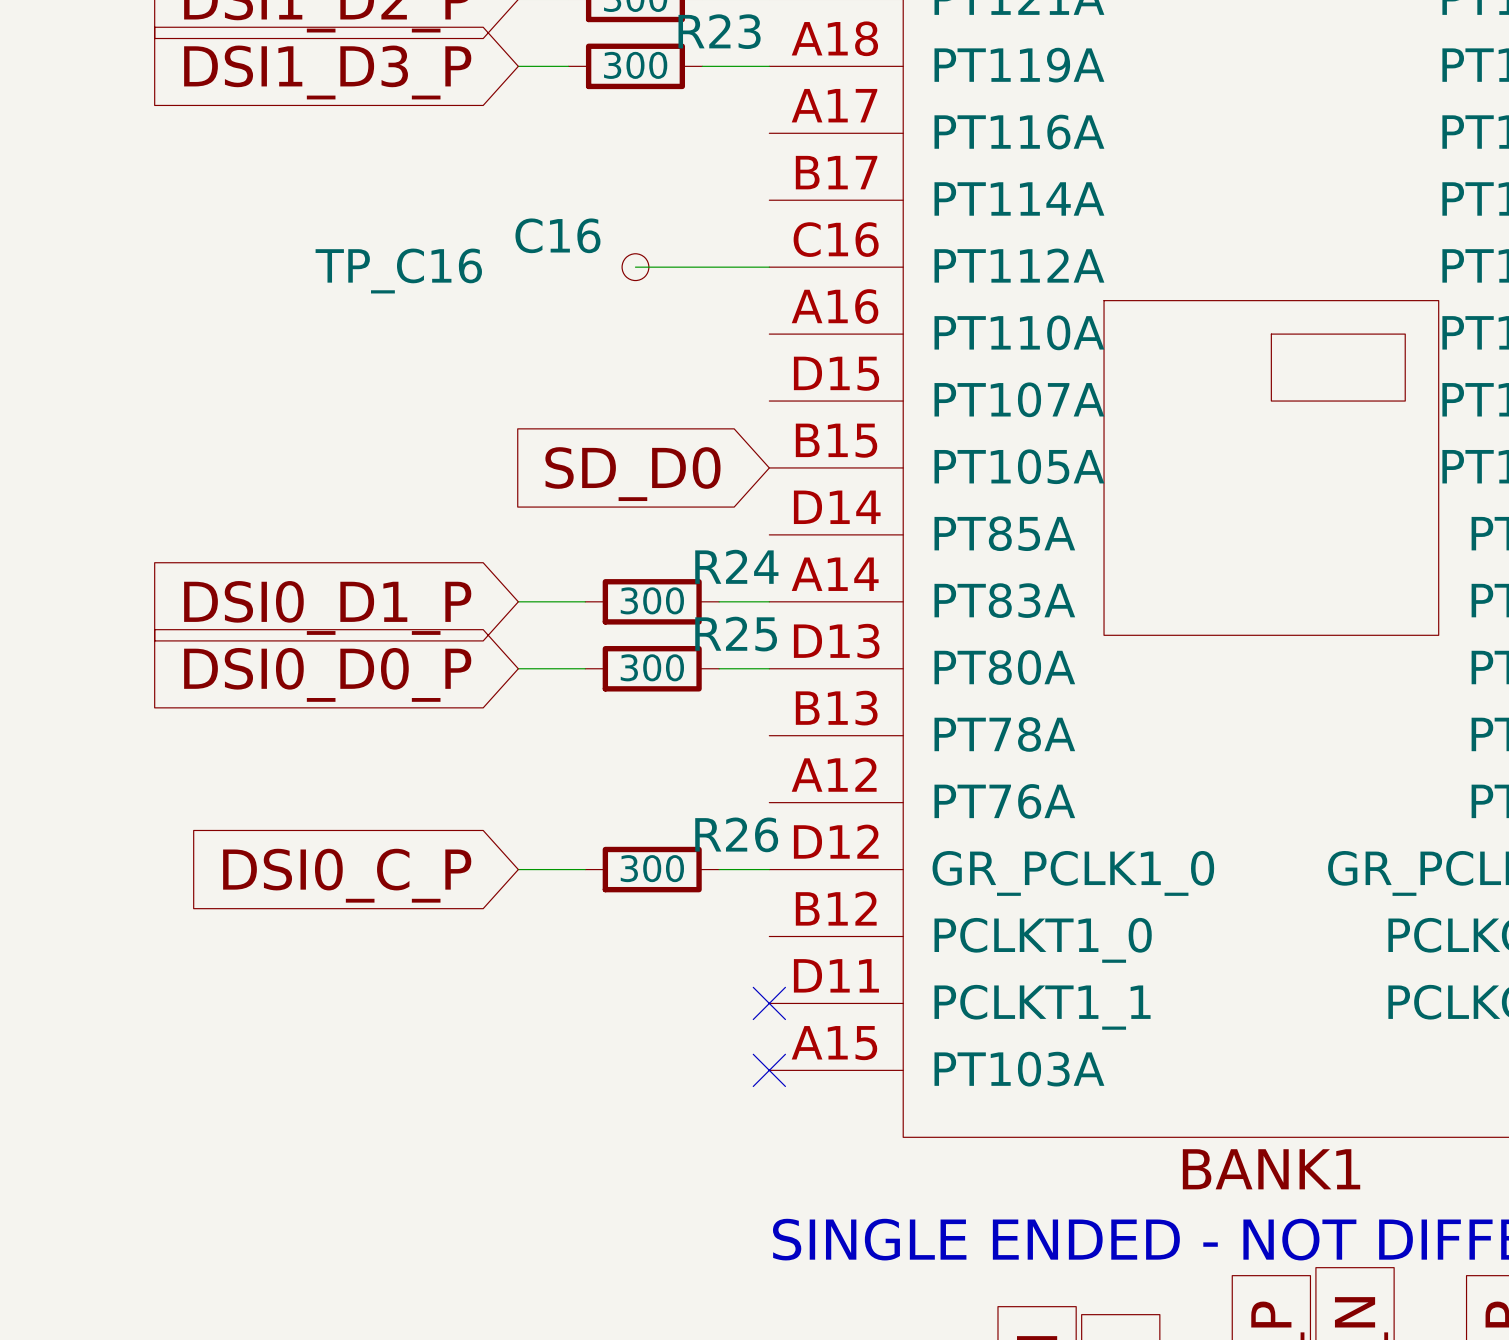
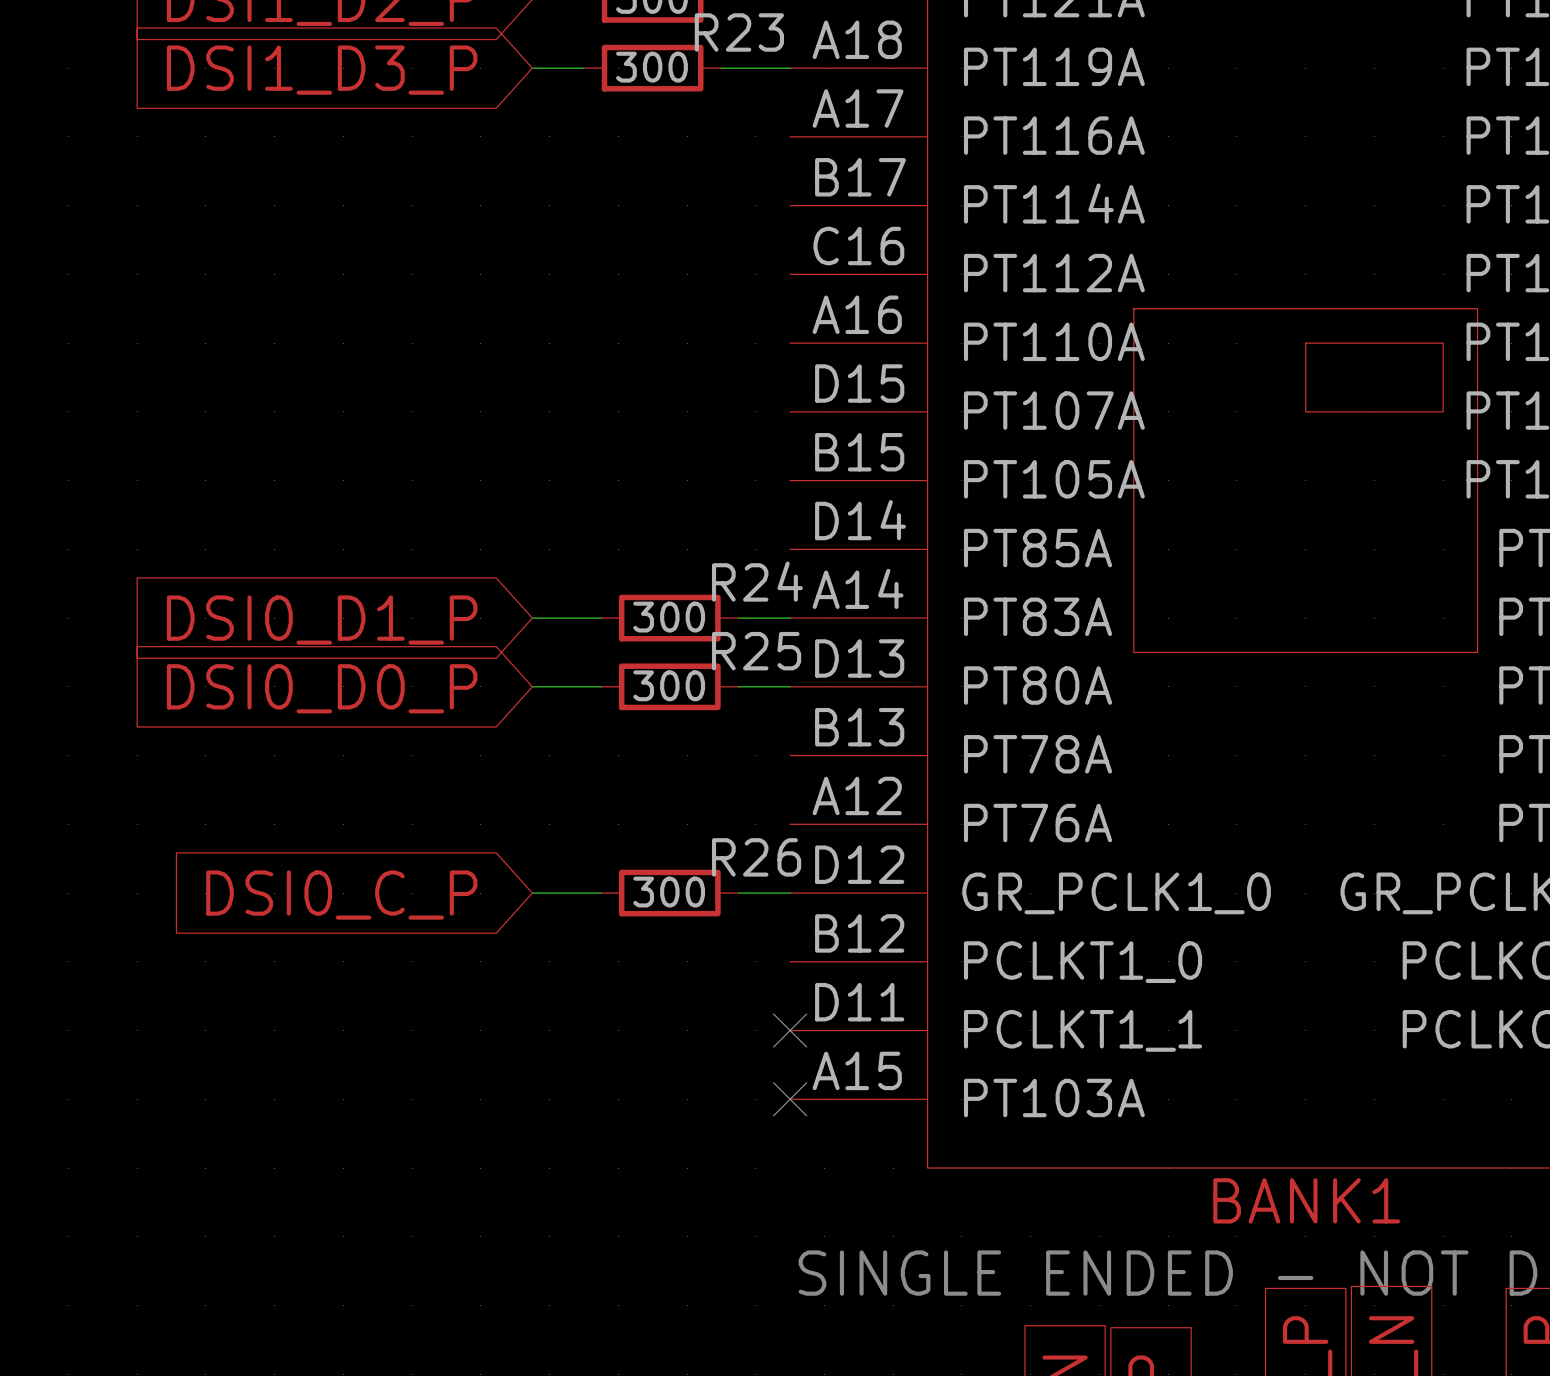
wire: (635, 267) (769, 267) -> none
TP_C16: C16 (635, 267) -> none
global label: SD_D0 (632, 474) -> none

